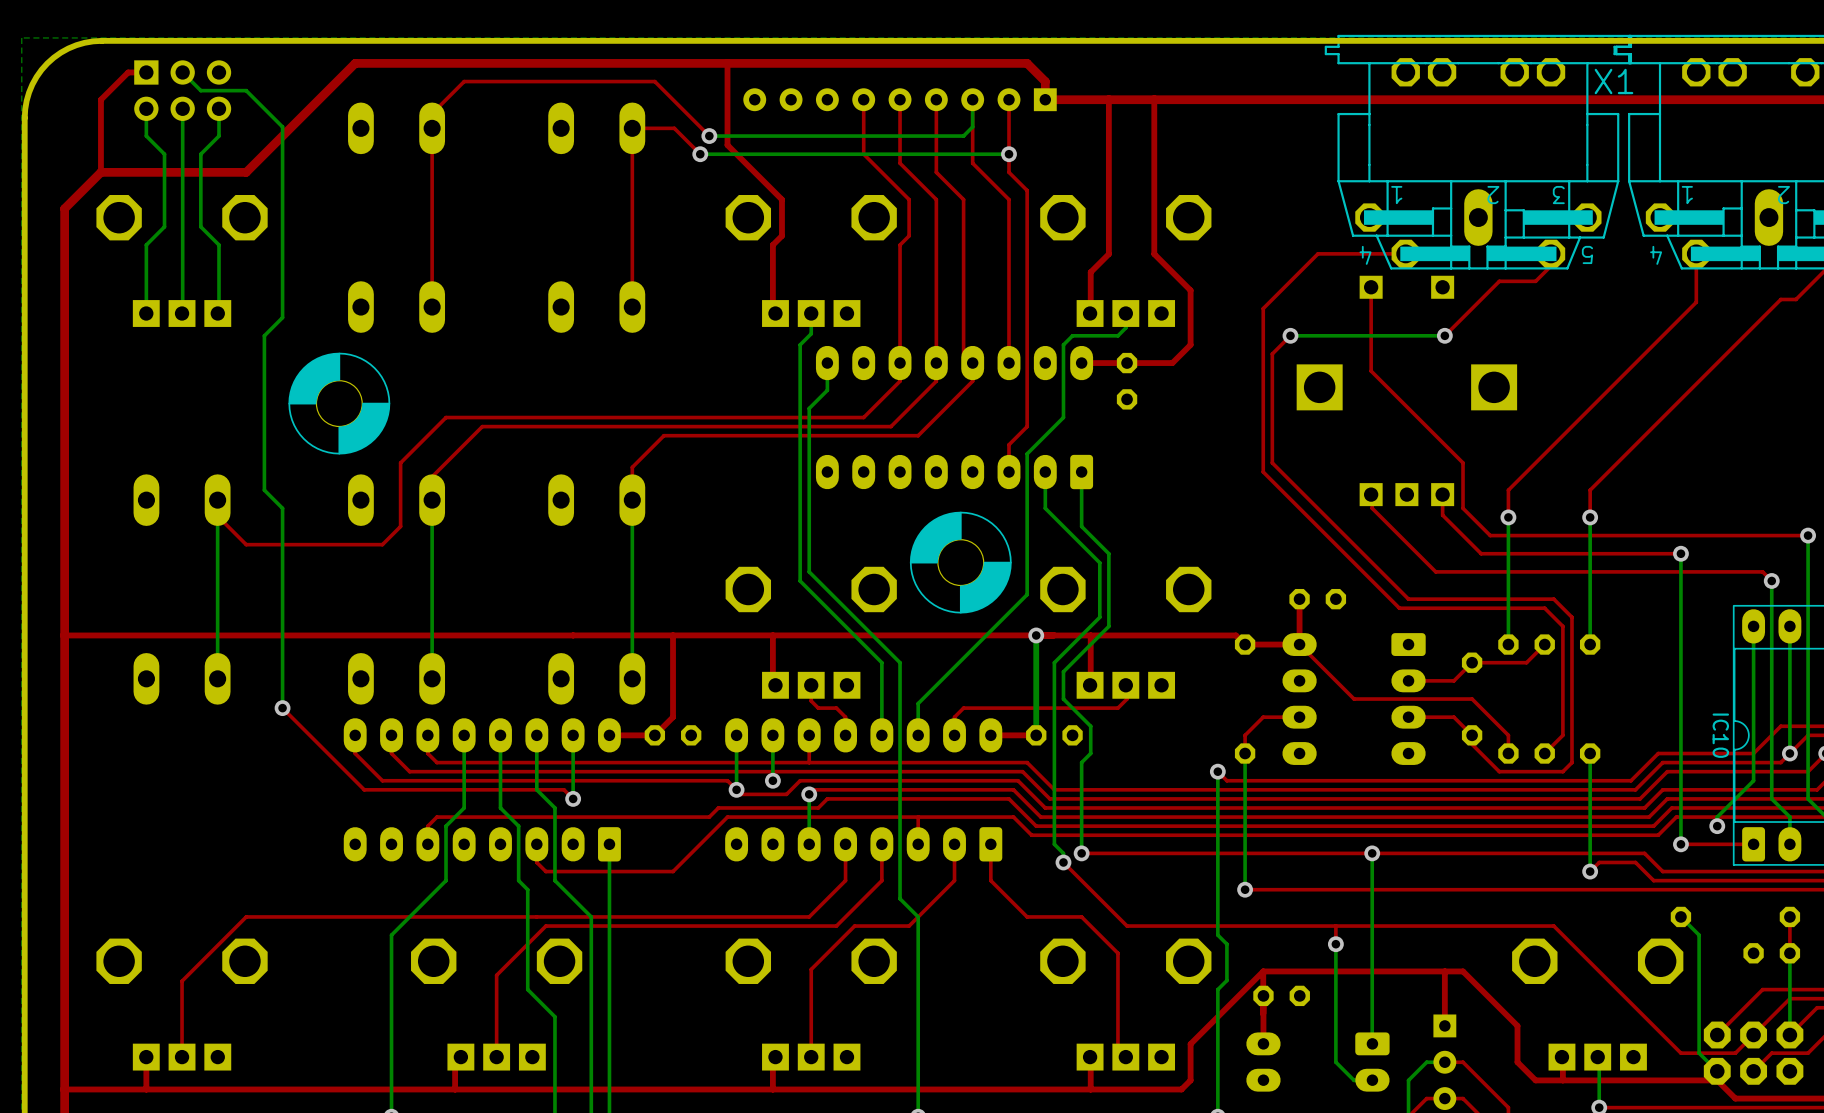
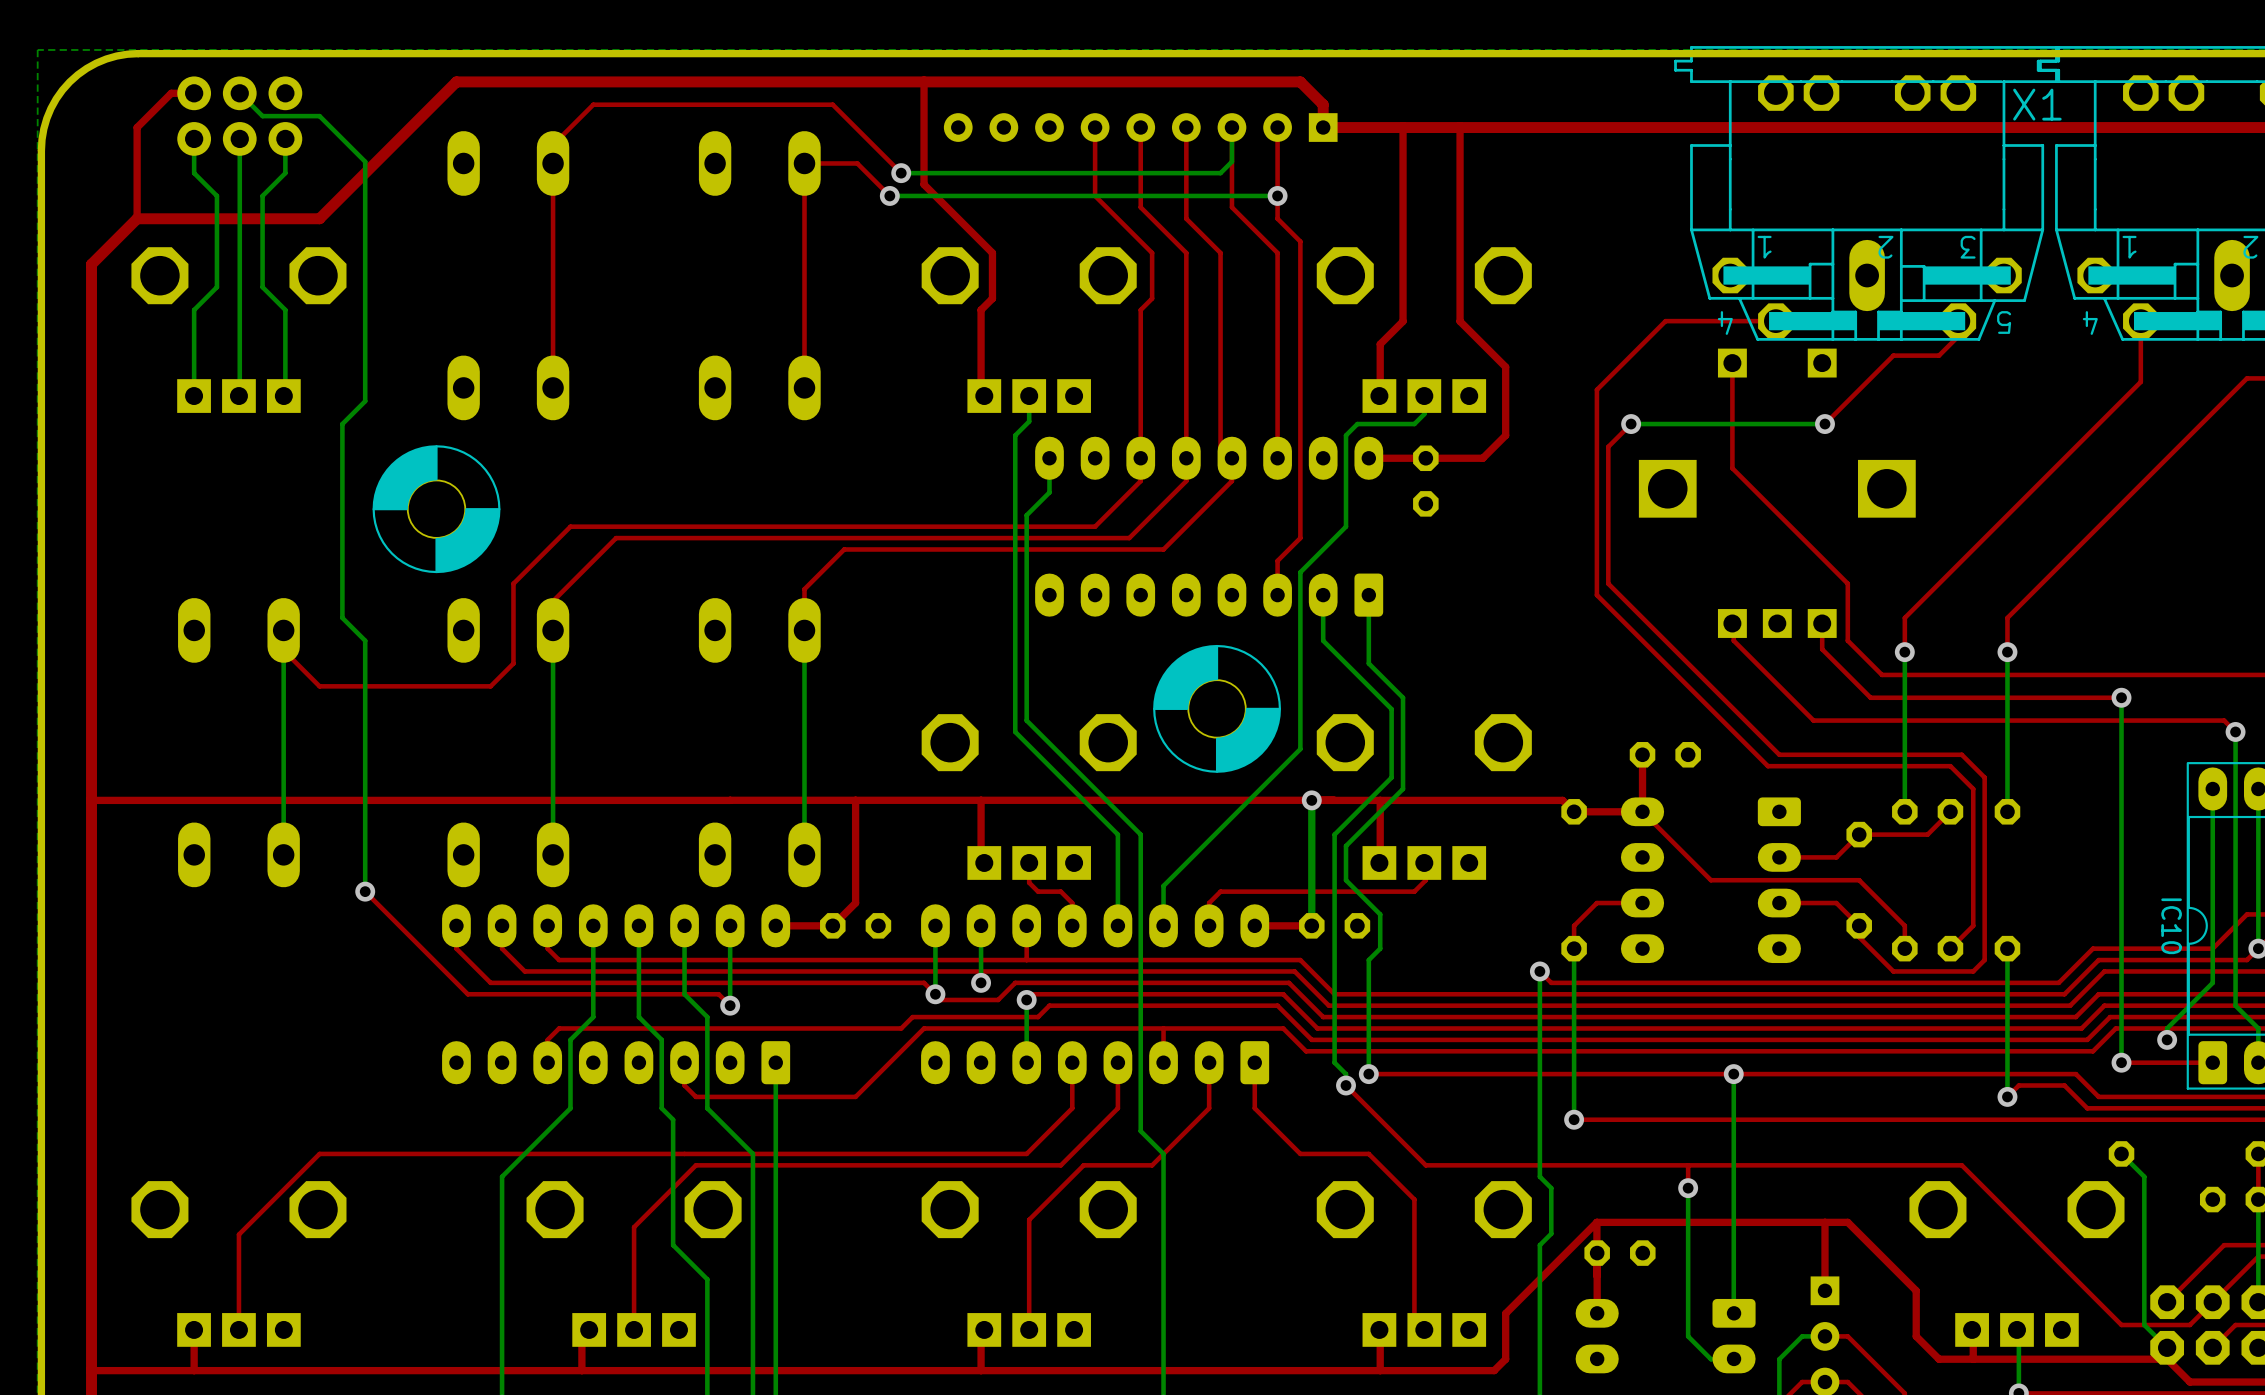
part: none -> (239, 93)
part: (182, 90) -> none
part: none -> (239, 138)

